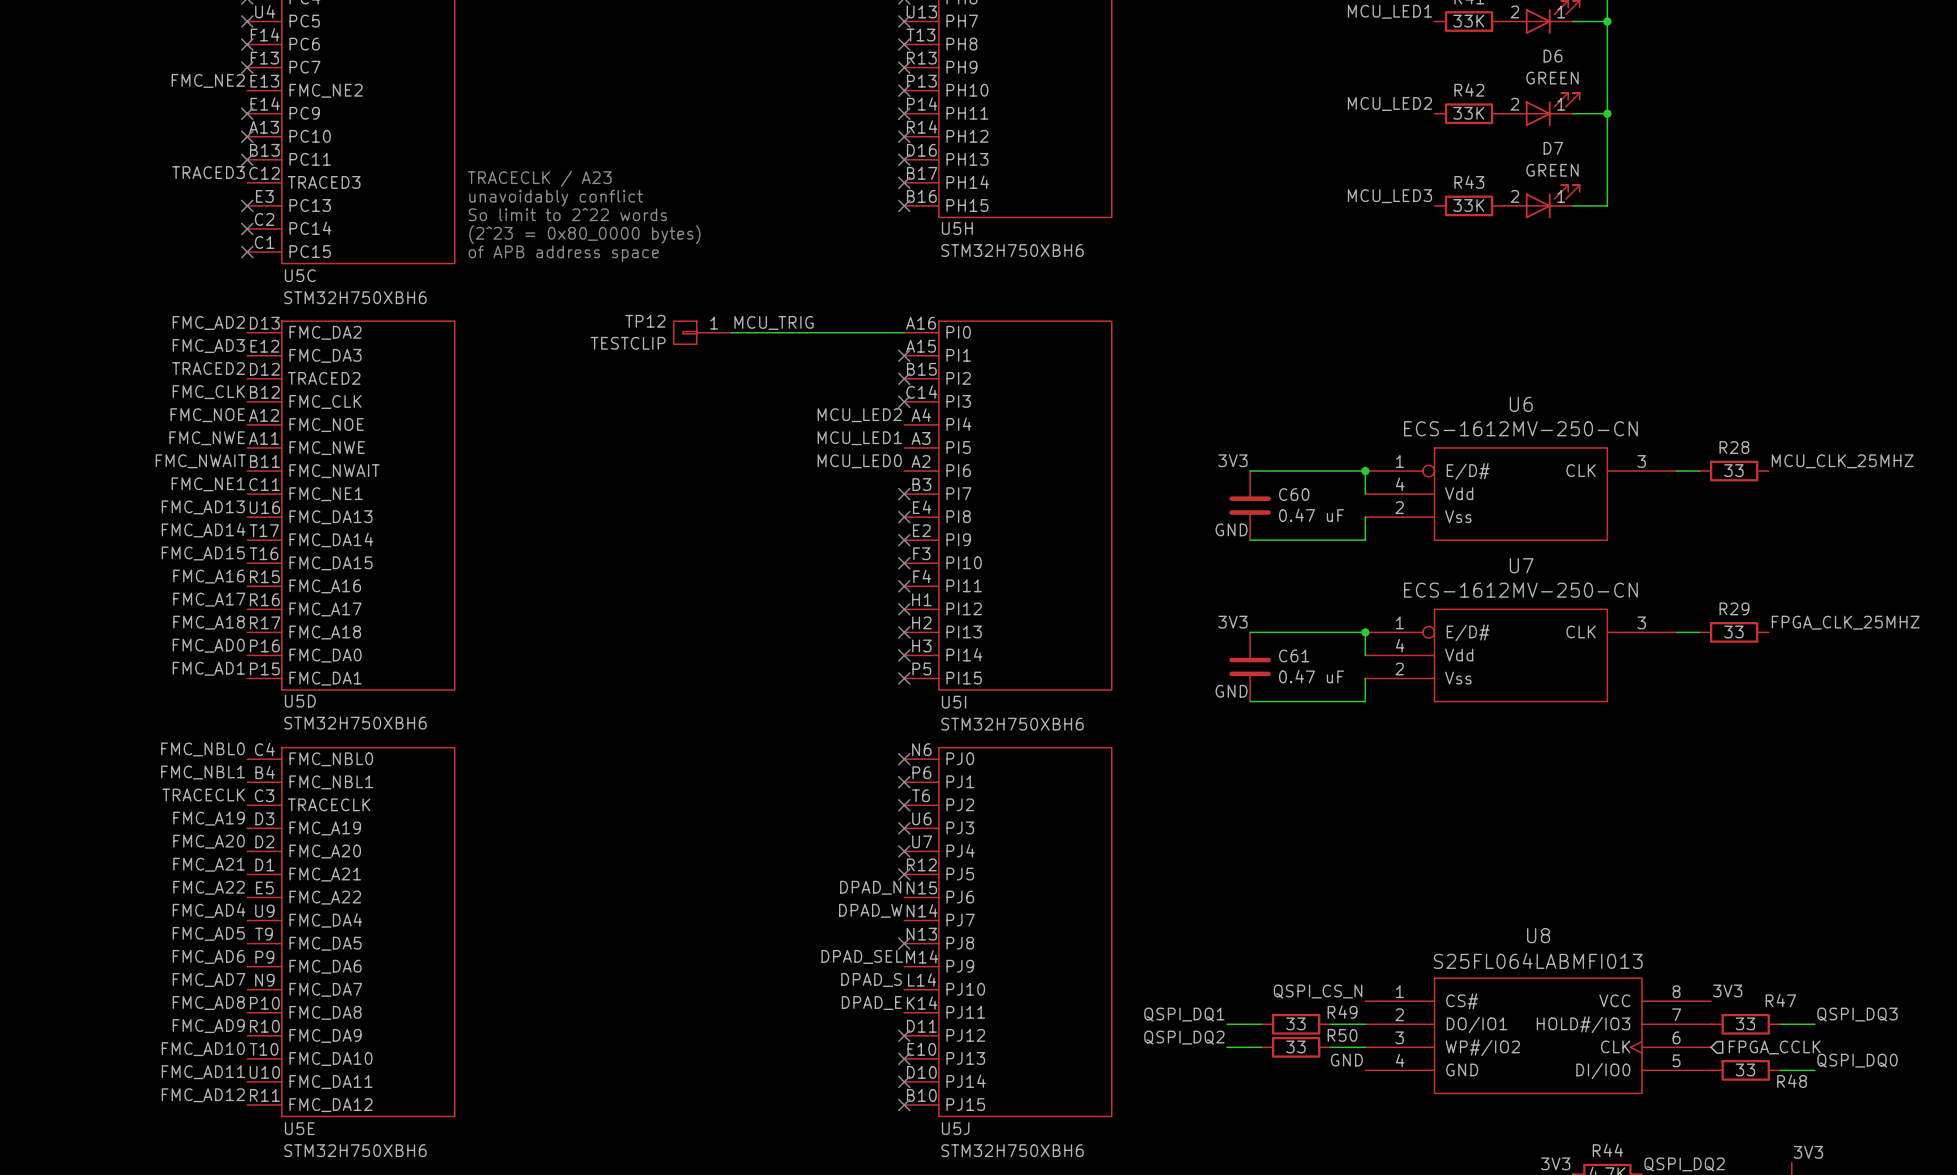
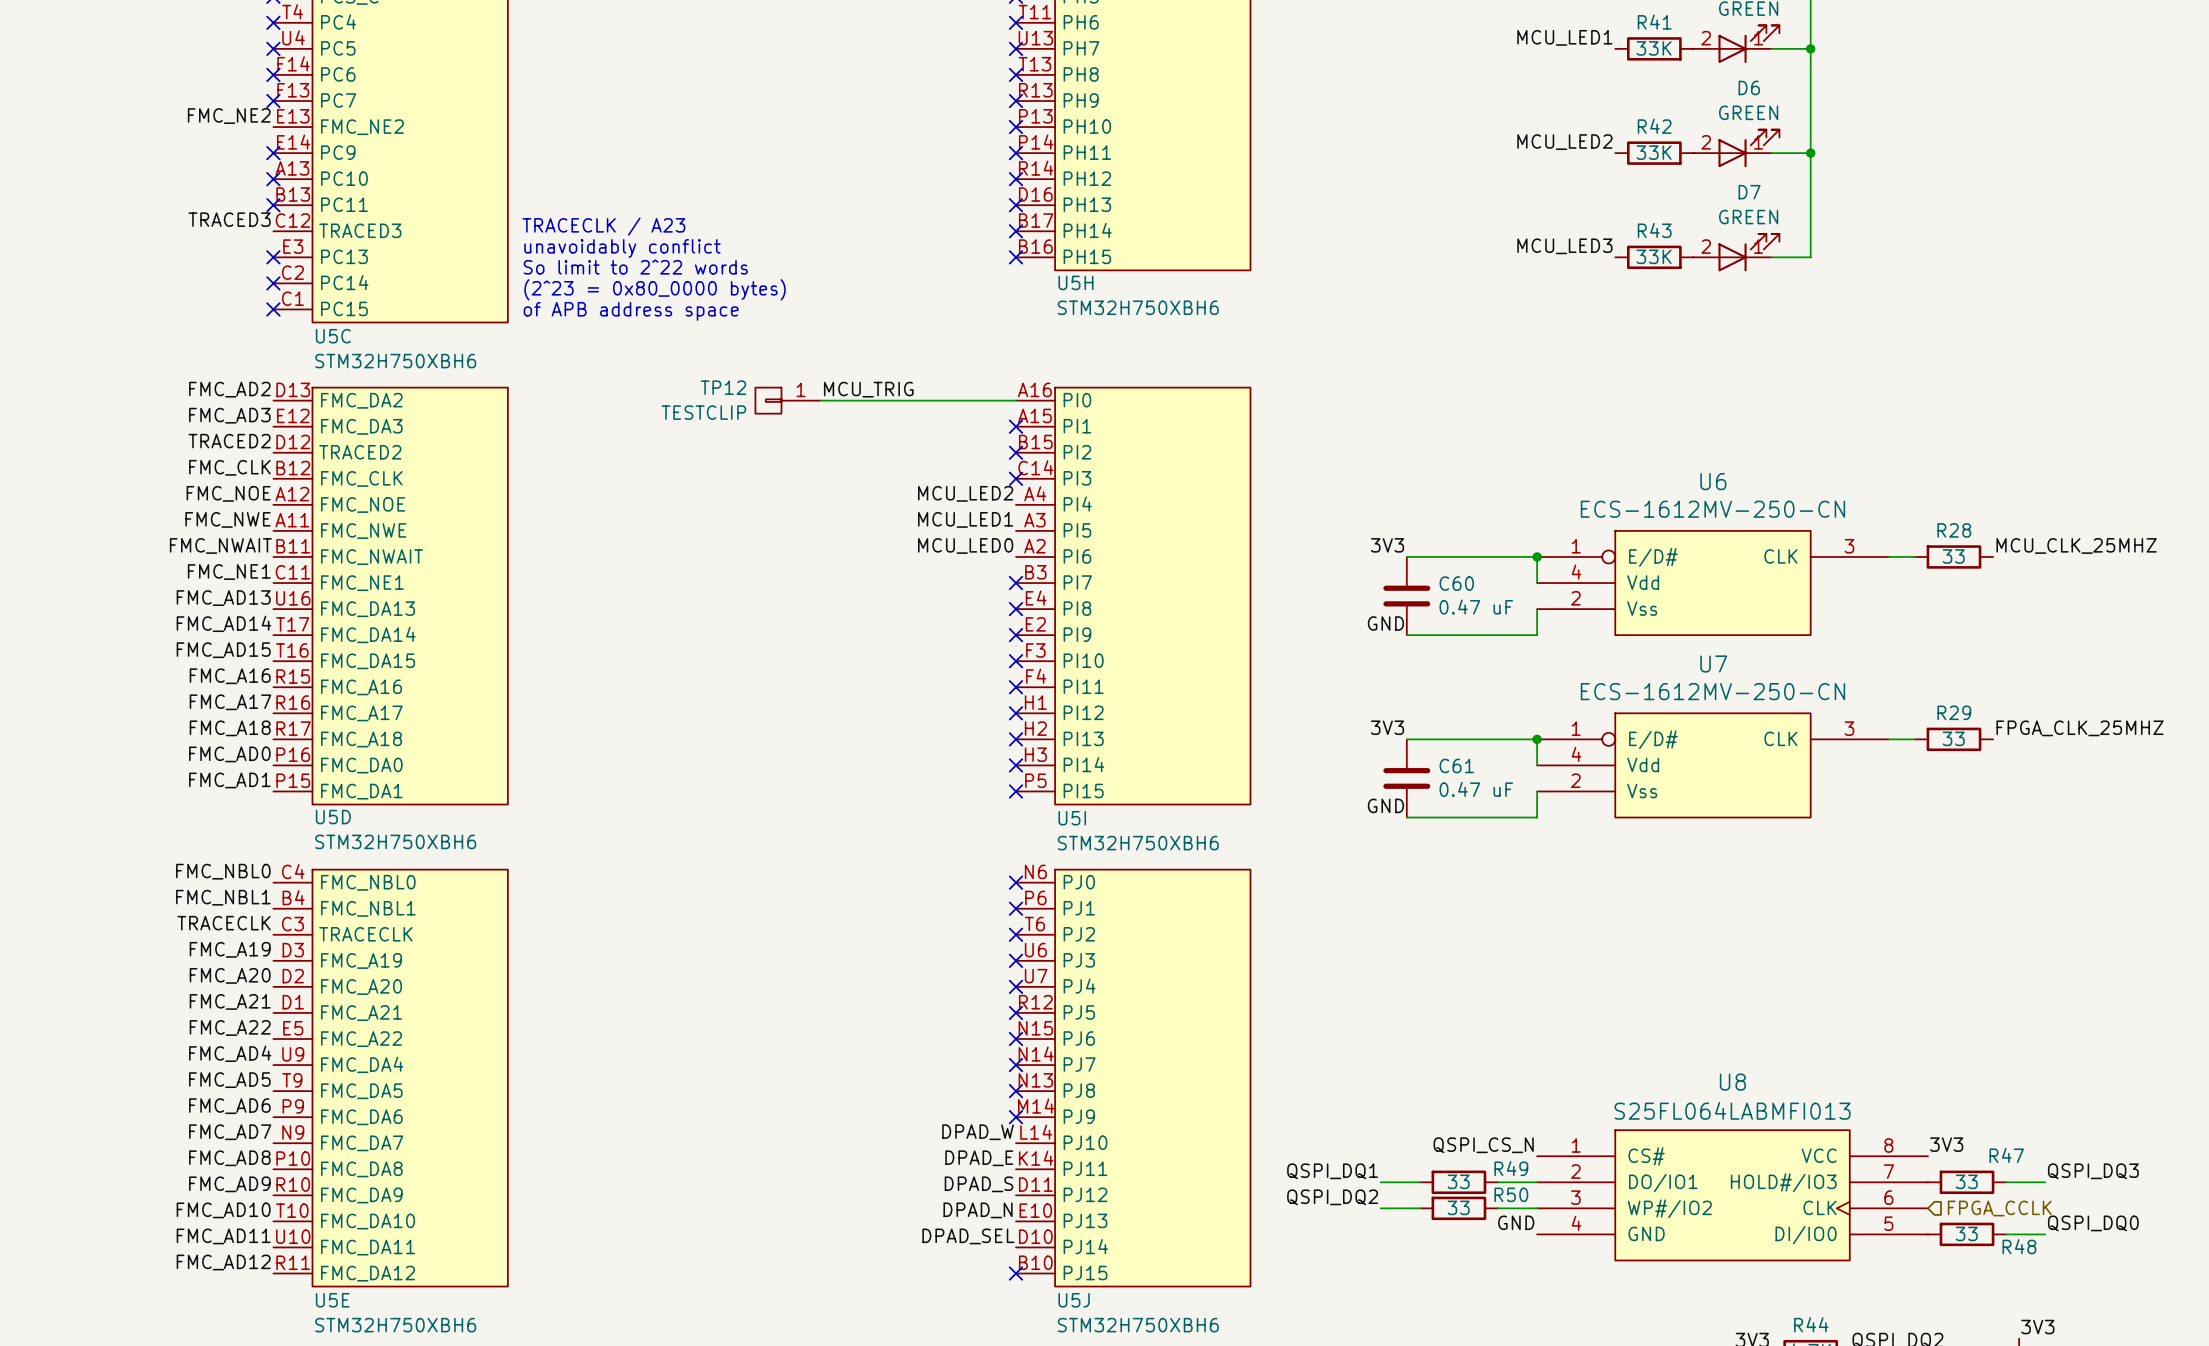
label position: DPAD_N (870, 887) -> DPAD_N (978, 1210)
no-connect mark: none -> (1015, 1039)
label: DPAD_W (870, 910) -> none
no-connect mark: none -> (1015, 1065)
label position: DPAD_SEL (862, 956) -> DPAD_SEL (968, 1236)
no-connect mark: none -> (1015, 1117)
label: DPAD_S (871, 979) -> DPAD_W (978, 1132)
label: none -> DPAD_S (978, 1184)
no-connect mark: (904, 1035) -> none
no-connect mark: (904, 1058) -> none
no-connect mark: (904, 1081) -> none

